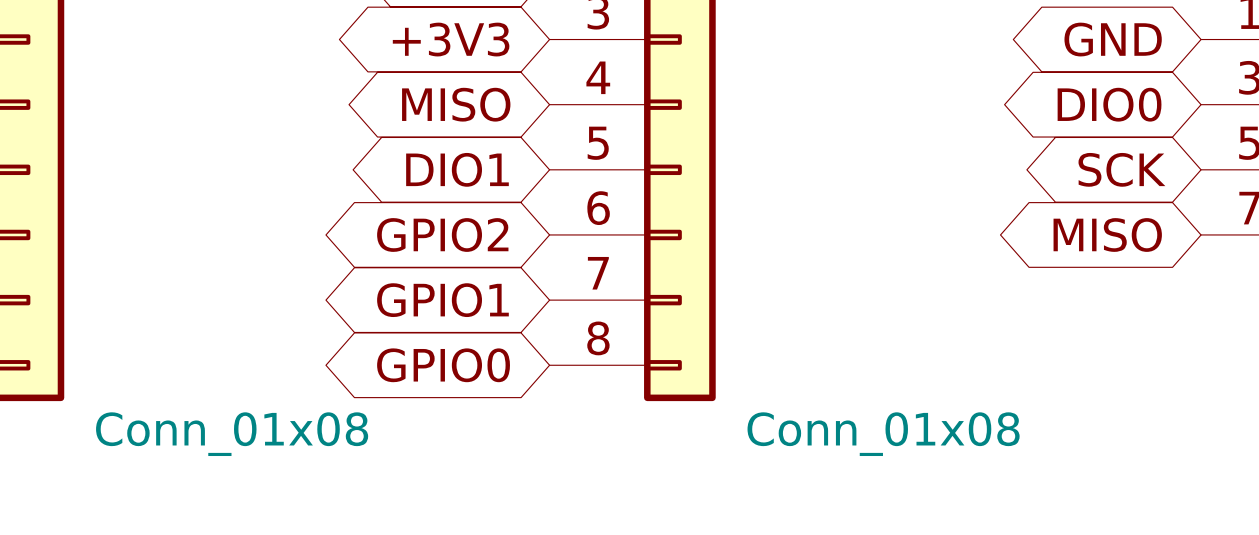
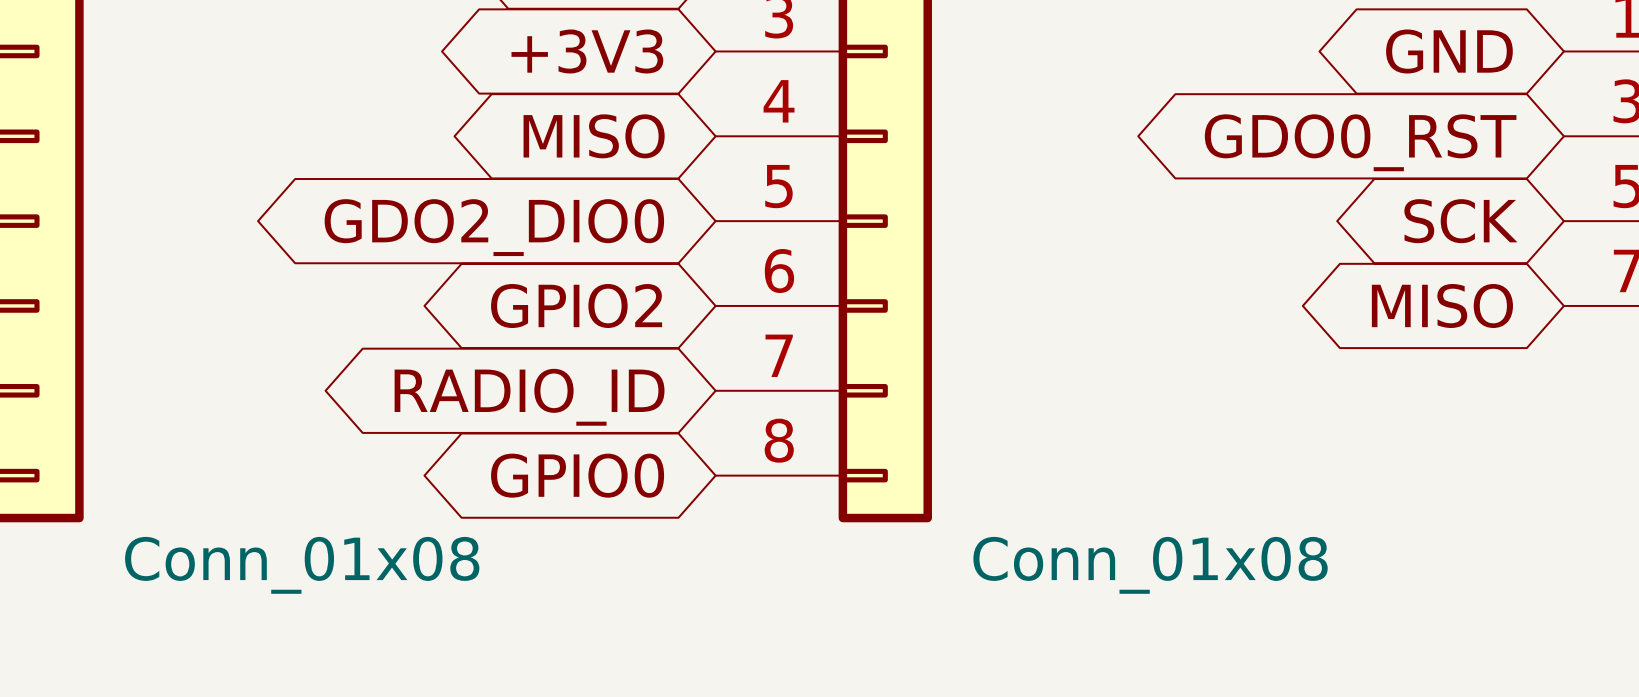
global label: DIO0 (1109, 104) -> GDO0_RST (1360, 142)
global label: DIO1 (457, 169) -> GDO2_DIO0 (494, 227)
global label: GPIO1 (442, 300) -> RADIO_ID (529, 397)

